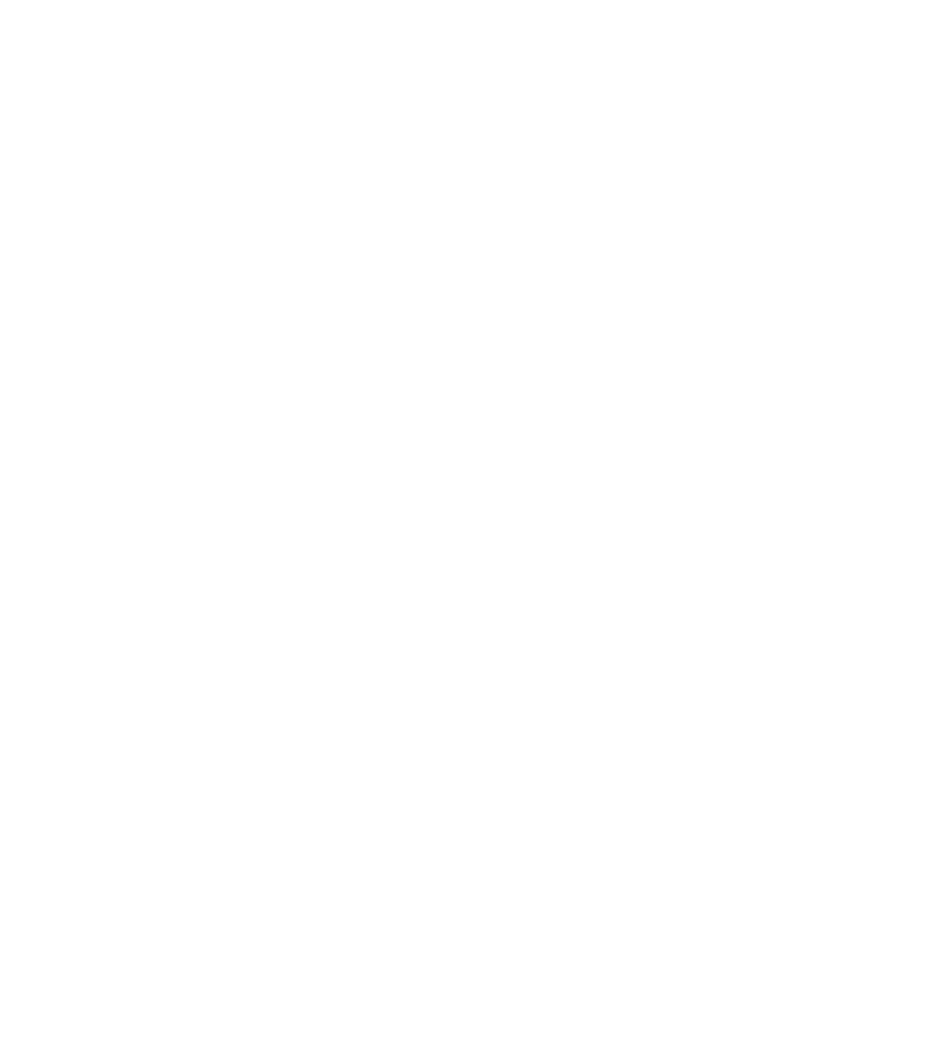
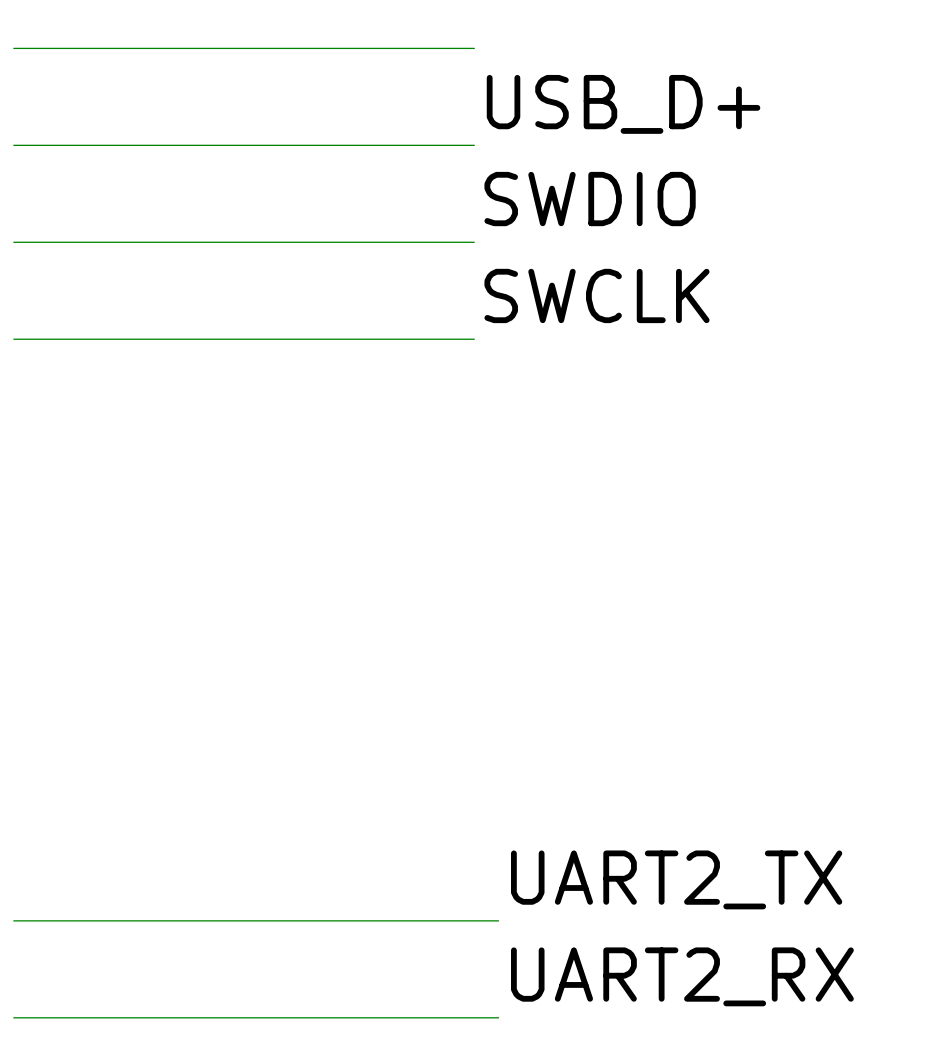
wire: none -> (13, 48) (474, 48)
label: none -> USB_D+ (623, 104)
wire: none -> (13, 145) (474, 145)
label: none -> SWDIO (590, 199)
wire: none -> (13, 242) (474, 242)
label: none -> SWCLK (597, 295)
wire: none -> (13, 339) (474, 339)
label: none -> UART2_TX (676, 879)
wire: none -> (13, 920) (498, 920)
label: none -> UART2_RX (682, 976)
wire: none -> (13, 1017) (498, 1017)

